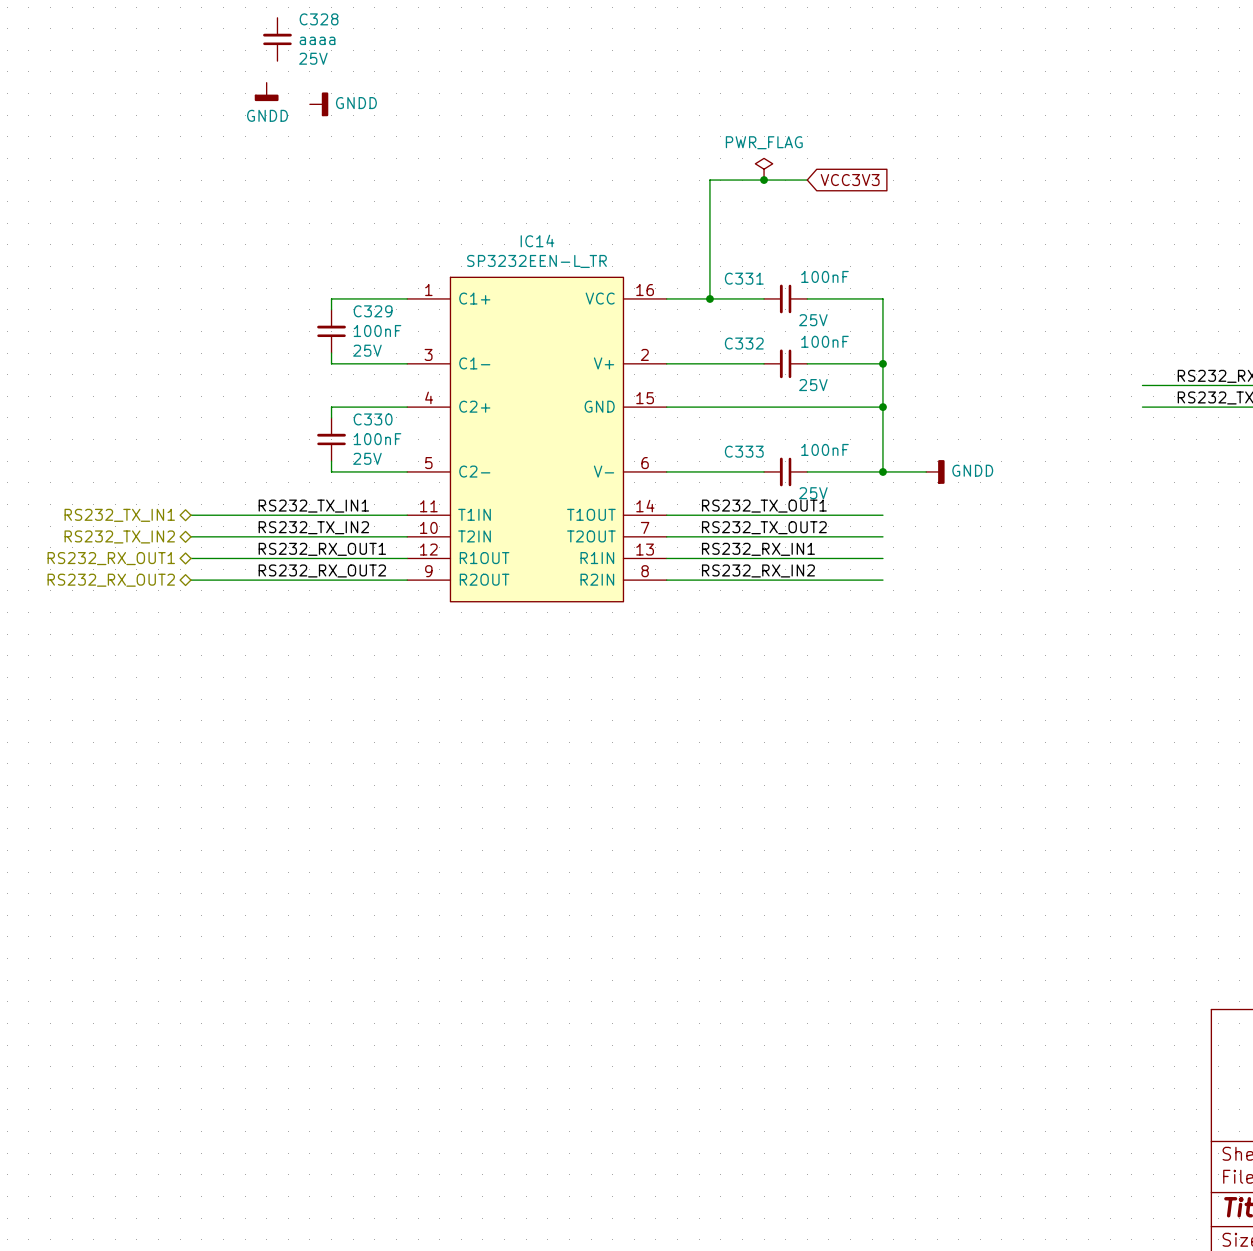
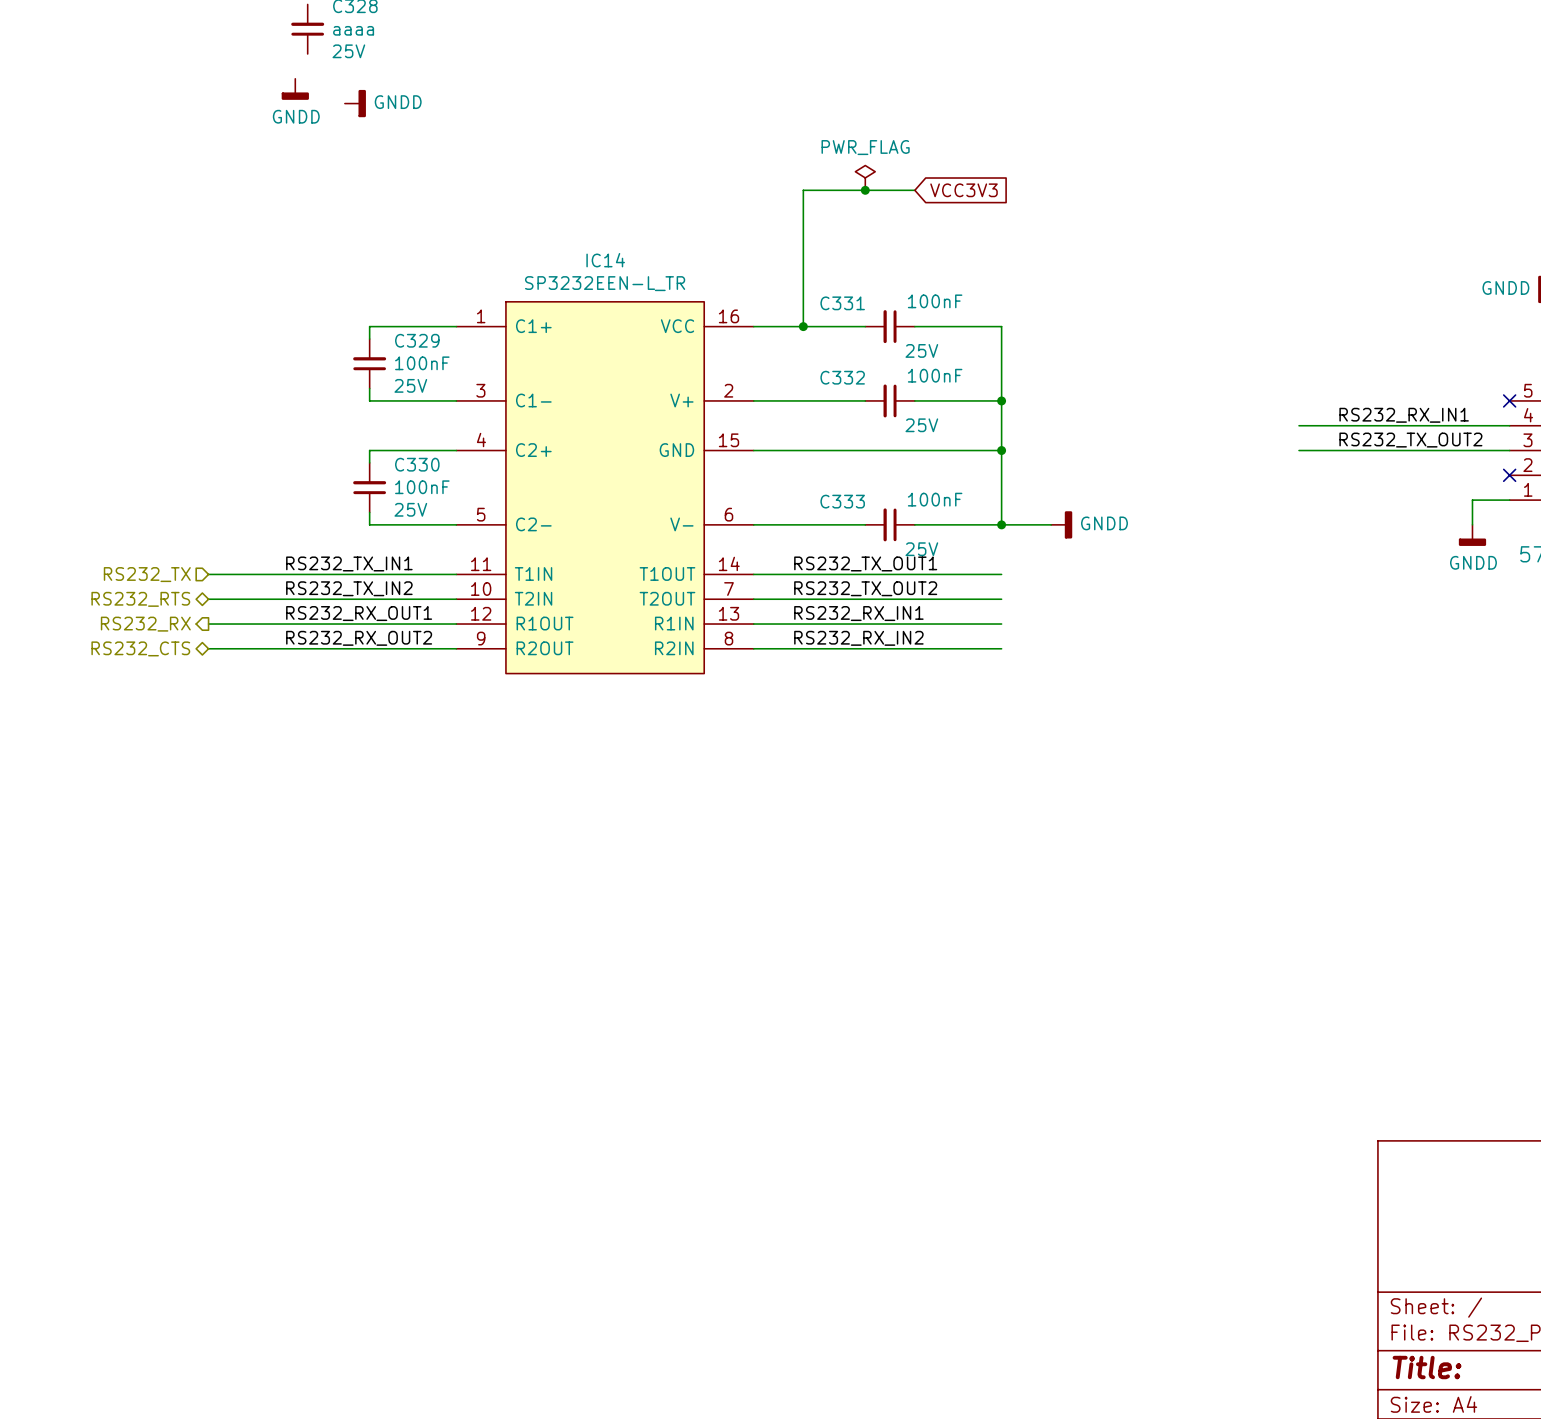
hierarchical label shape: bidirectional (119, 515) -> input (147, 574)
hierarchical label: RS232_TX_IN1 (119, 515) -> RS232_TX (147, 574)
hierarchical label: RS232_TX_IN2 (119, 536) -> RS232_RTS (140, 599)
hierarchical label shape: bidirectional (111, 558) -> output (145, 624)
hierarchical label: RS232_RX_OUT1 (111, 558) -> RS232_RX (145, 624)
hierarchical label: RS232_RX_OUT2 (111, 580) -> RS232_CTS (140, 648)

